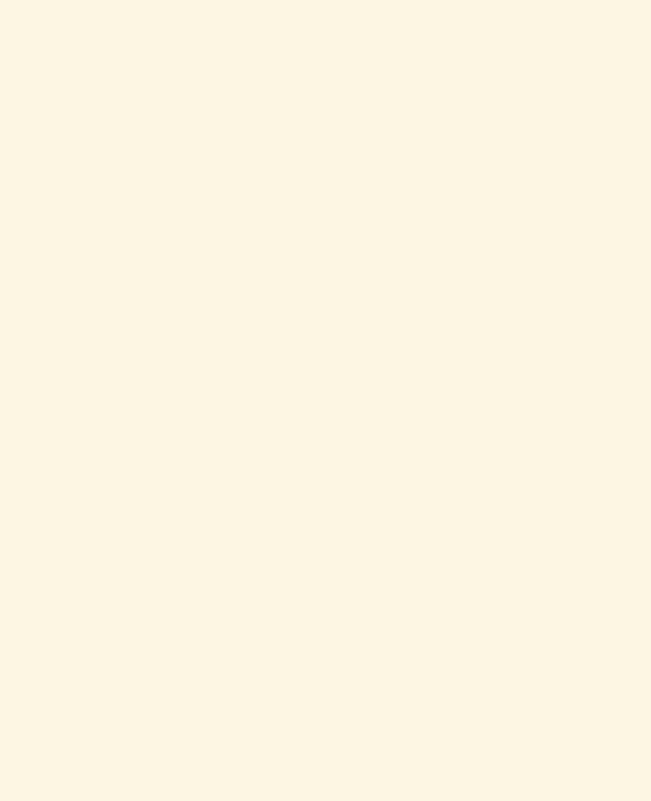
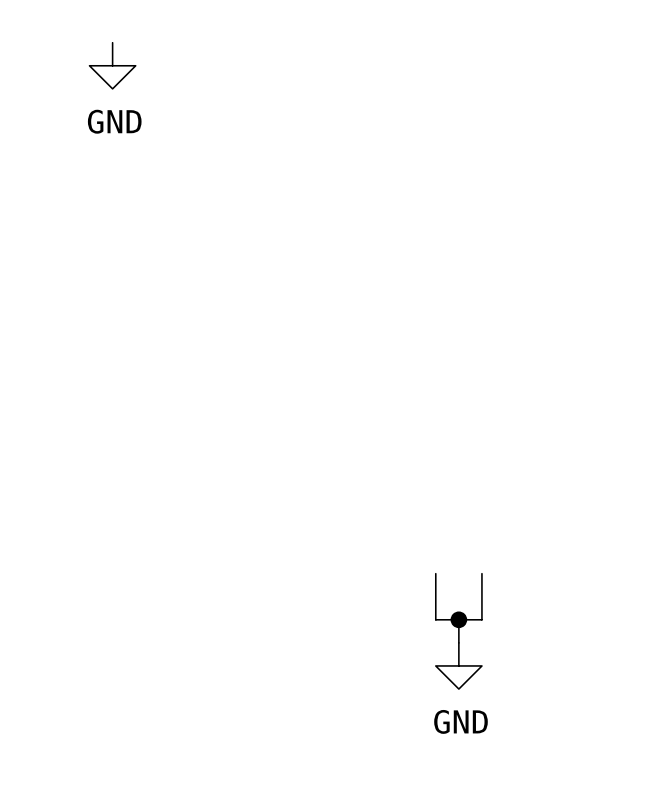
power symbol: none -> GND (112, 65)
wire: none -> (435, 573) (435, 619) (481, 619) (481, 573)
wire: none -> (458, 619) (458, 642)
junction: none -> (458, 619)
power symbol: none -> GND (458, 665)

